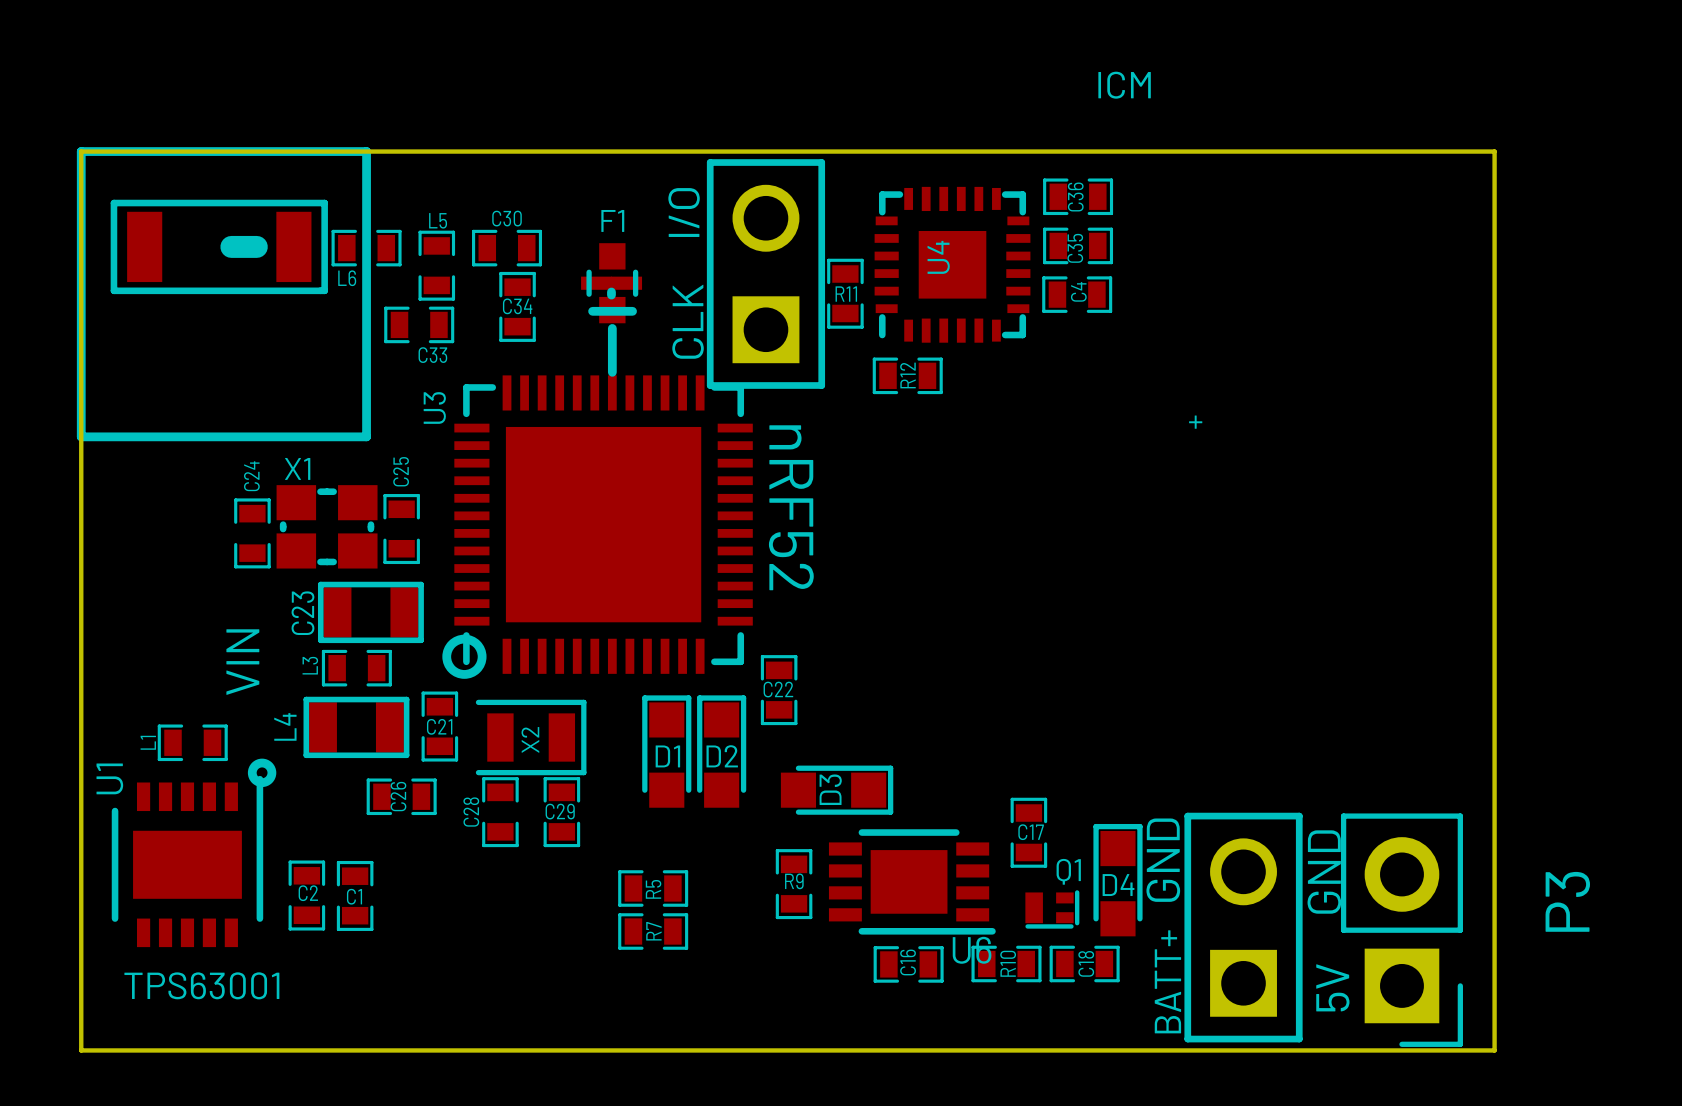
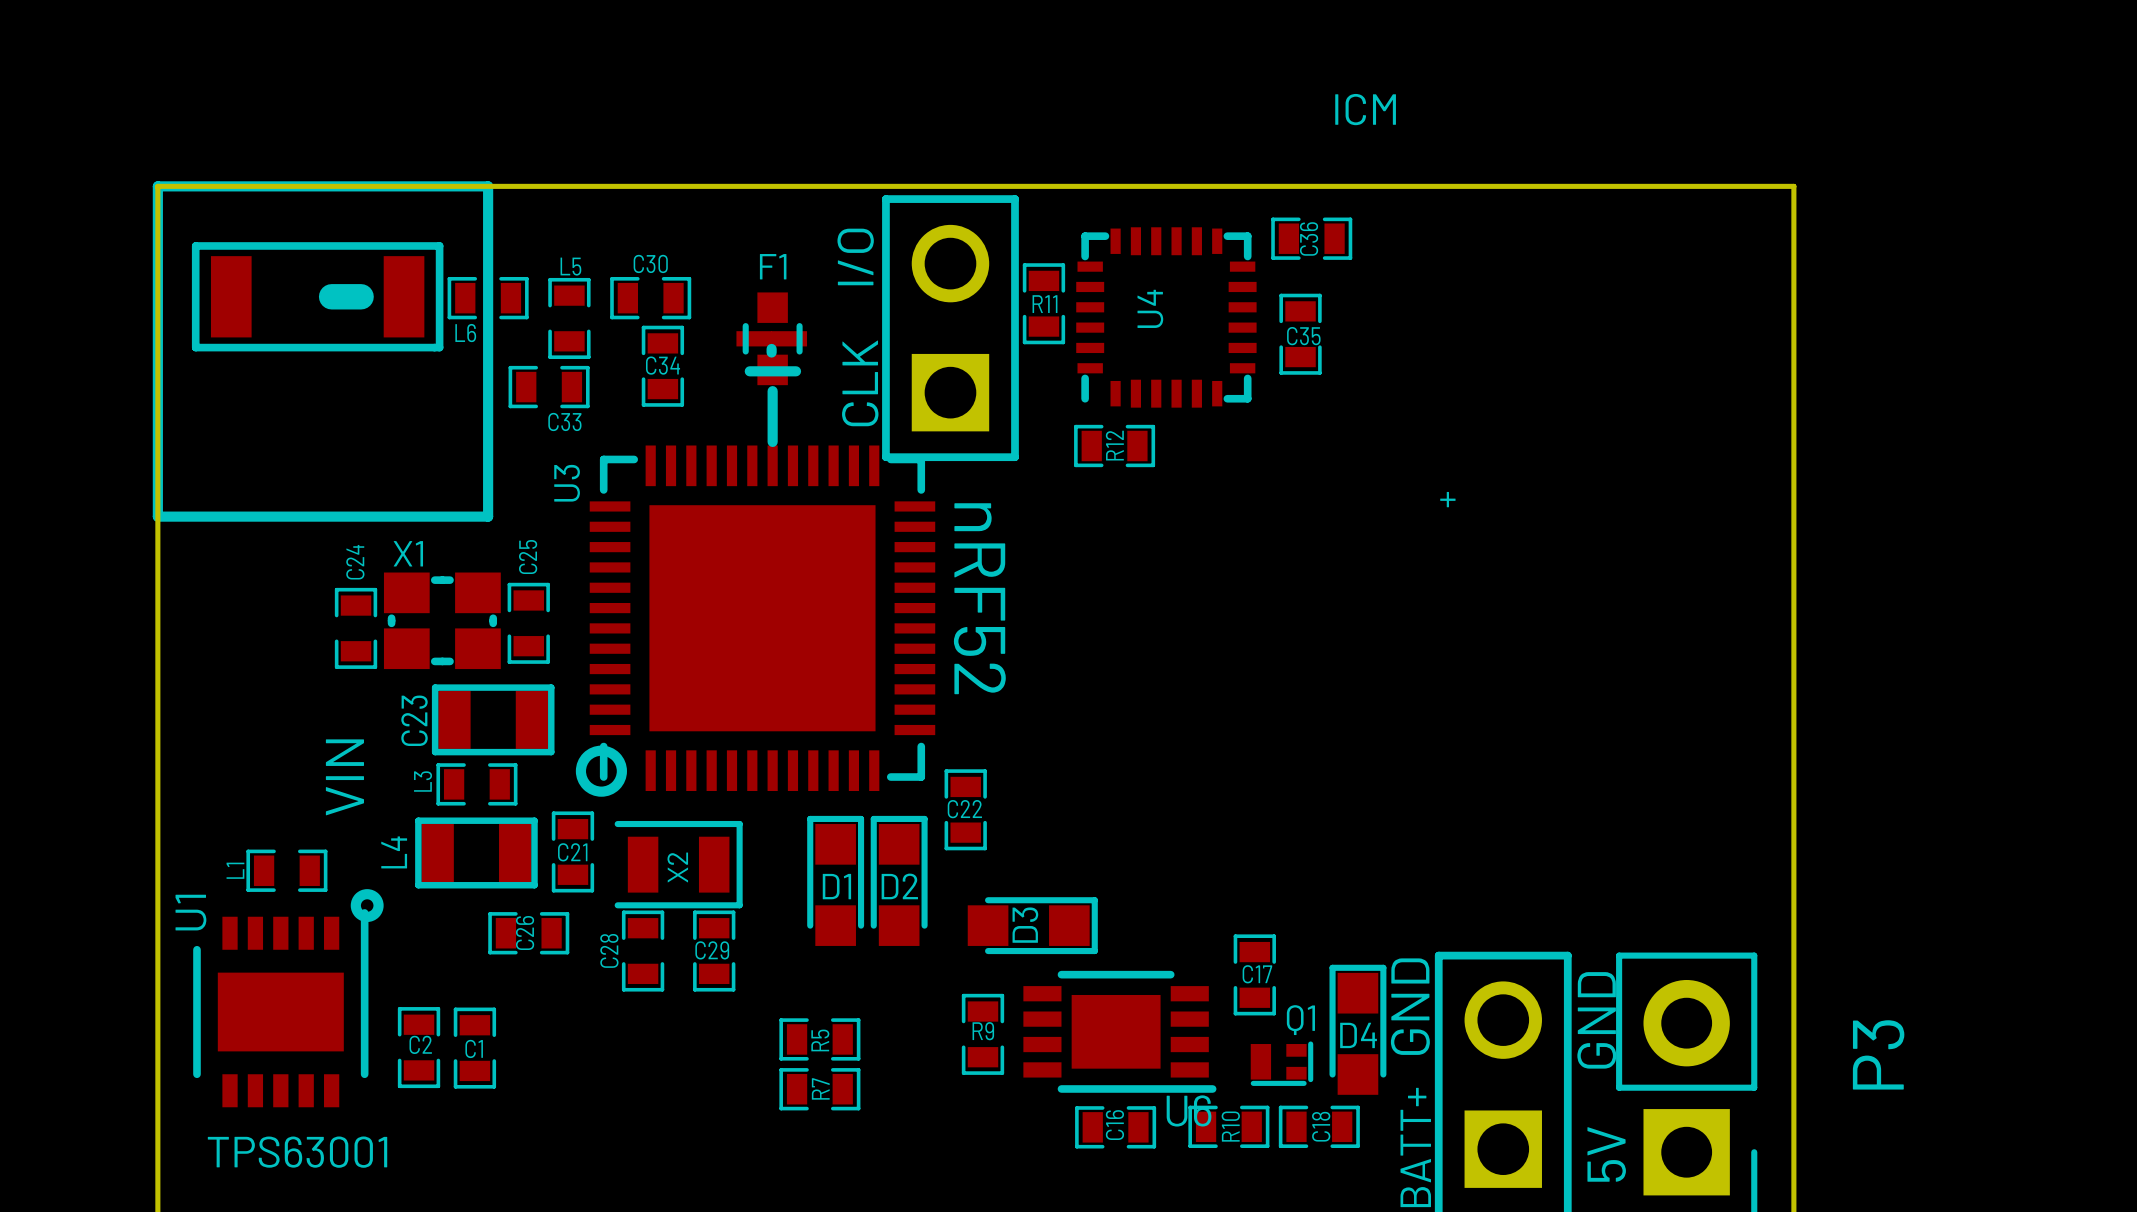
U4 footprint: [874, 186, 1031, 343] -> [1076, 227, 1257, 408]
C35 rotation: 0° (1078, 245) -> 90° clockwise (1300, 334)
R11 position: (845, 293) -> (1043, 303)
C4: (1077, 294) -> none

